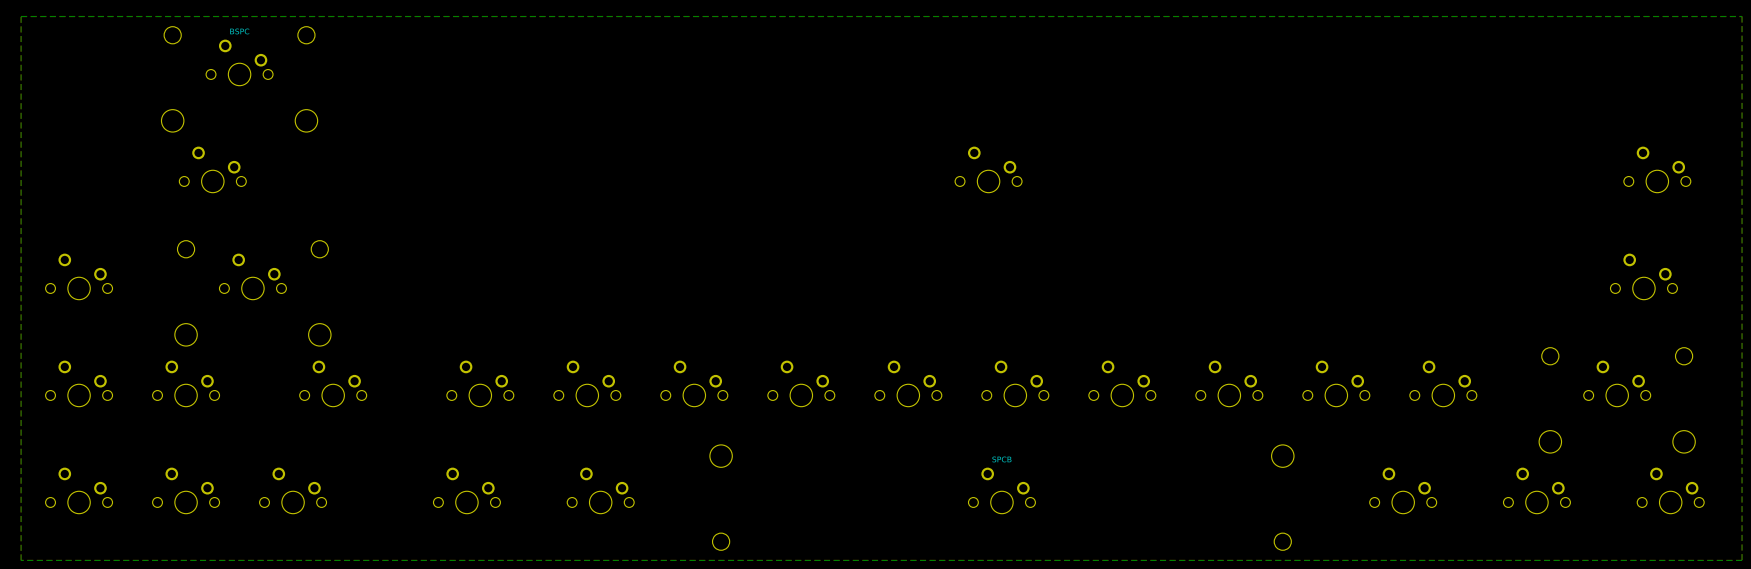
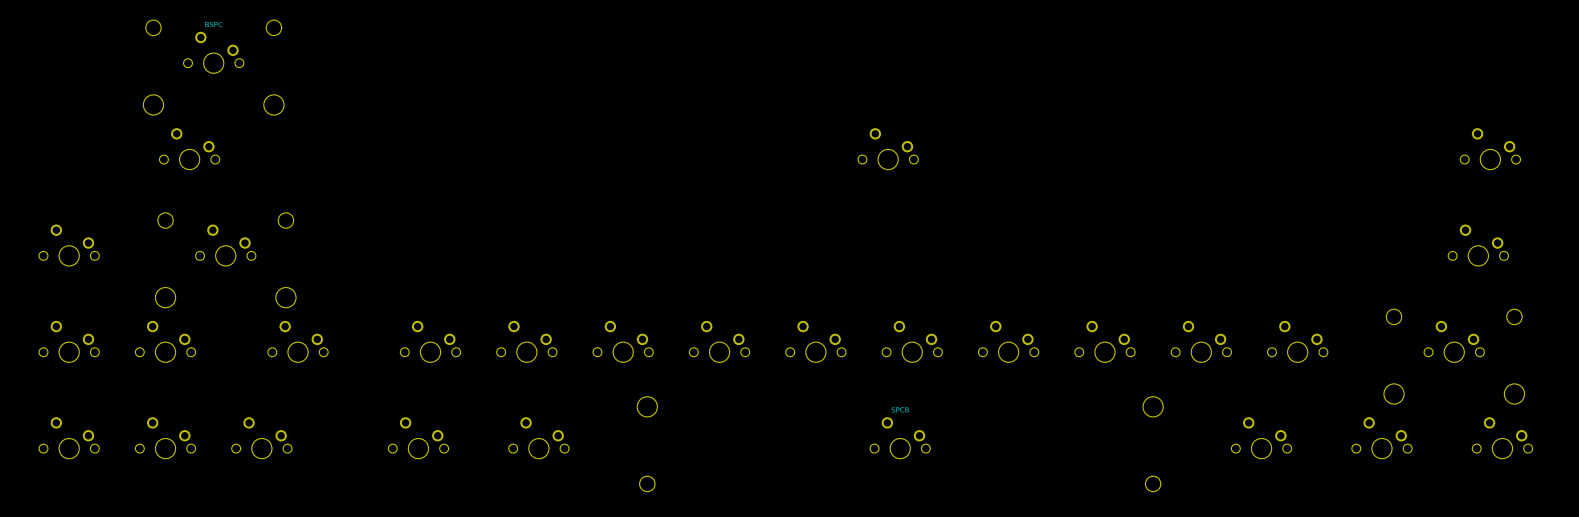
bottom zone outline: (1742, 16) (1742, 560) (21, 560) (21, 16) (1742, 16) -> none

